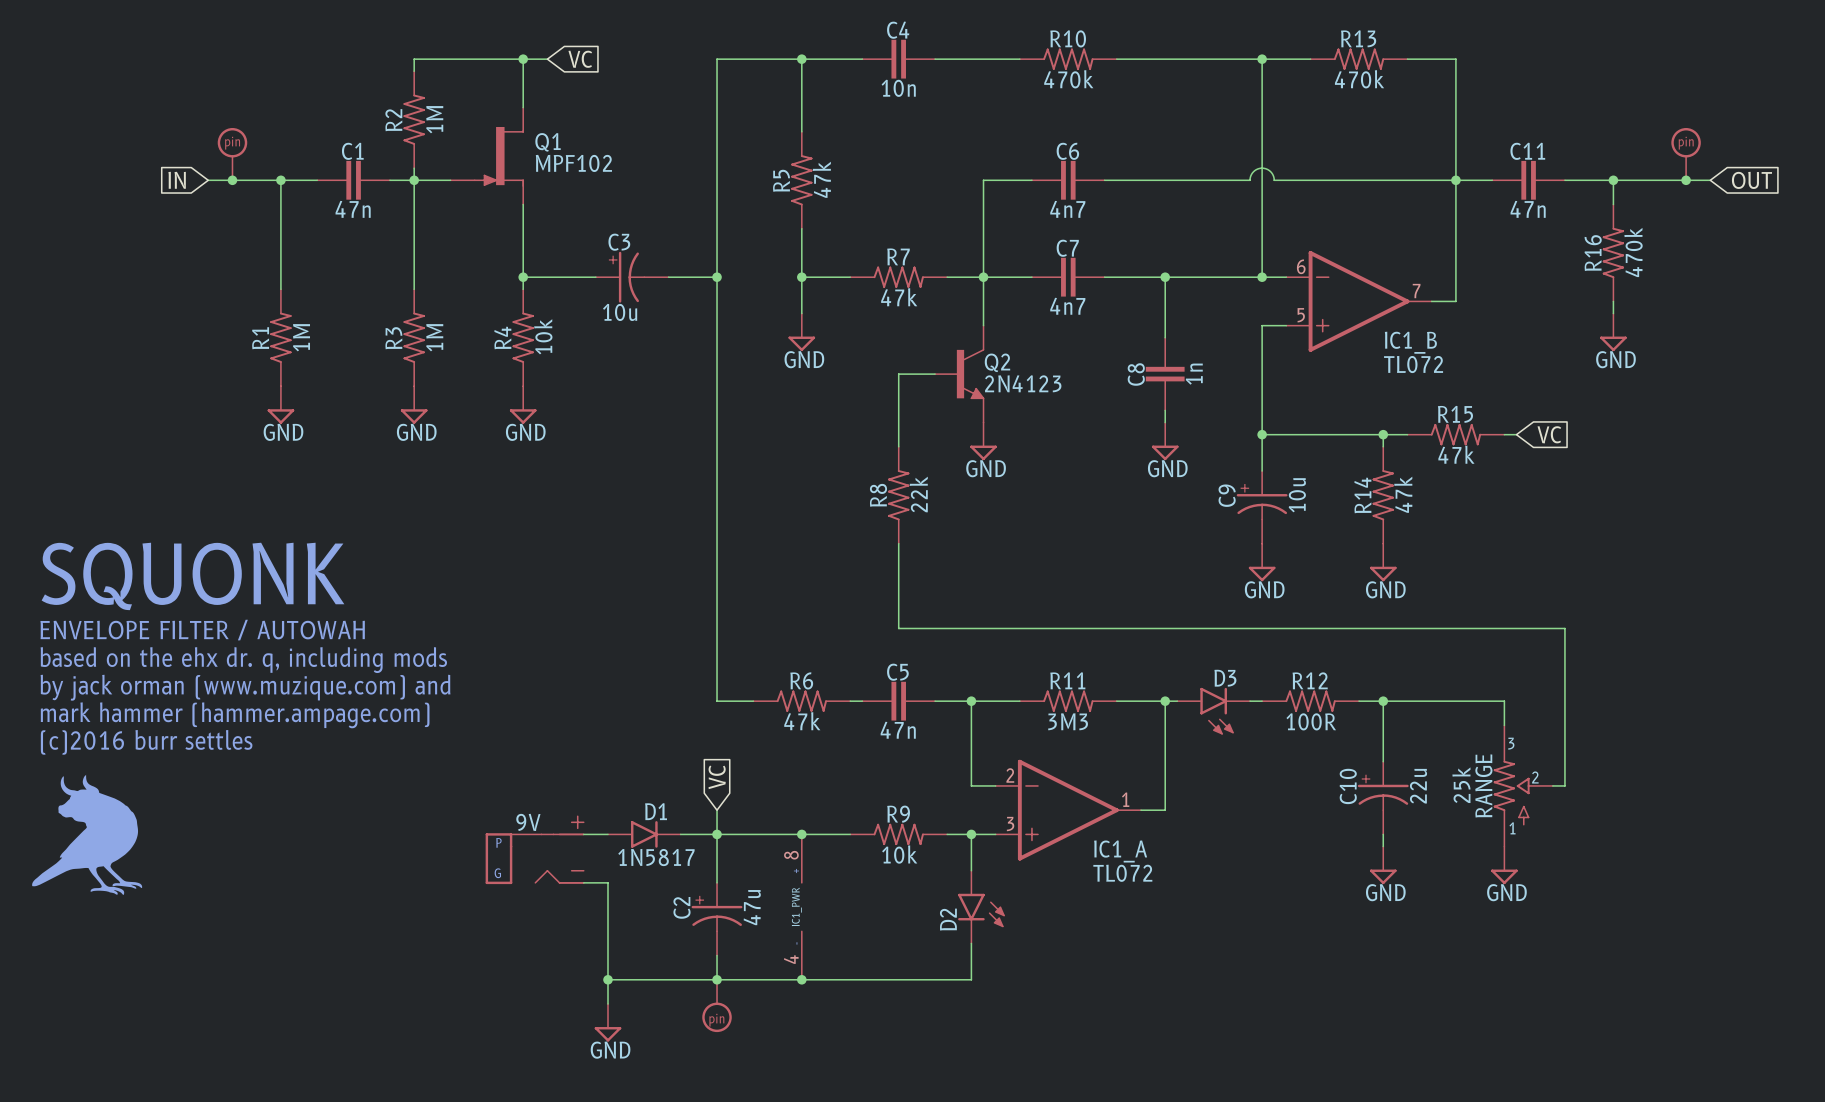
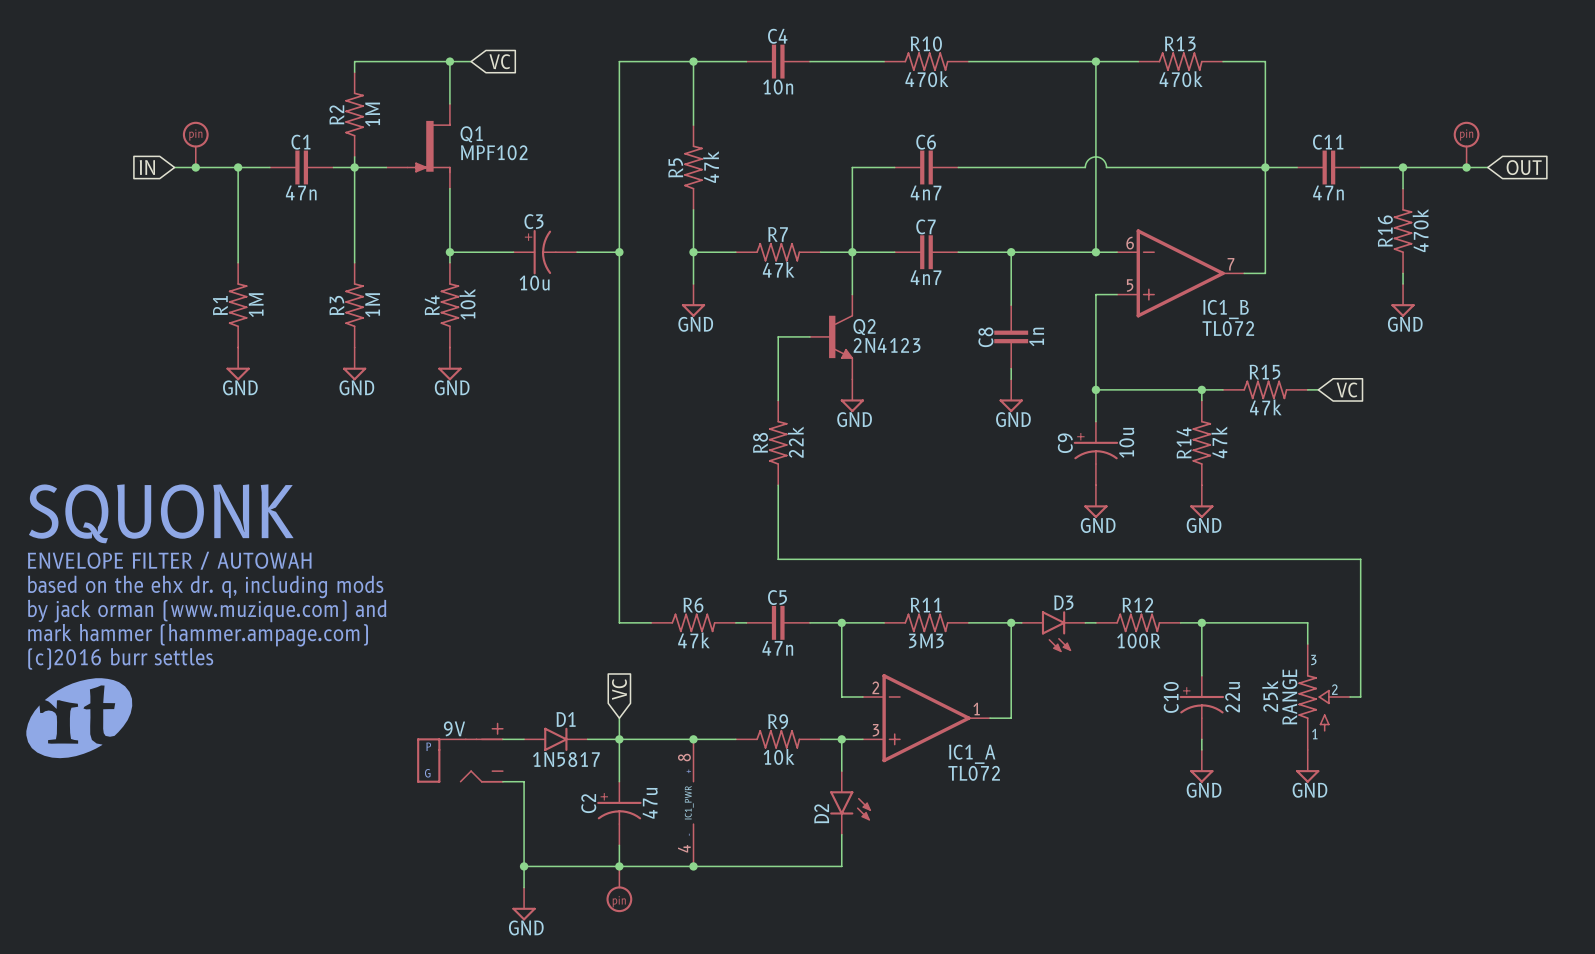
part: none -> (79, 718)
part: (87, 834) -> none

